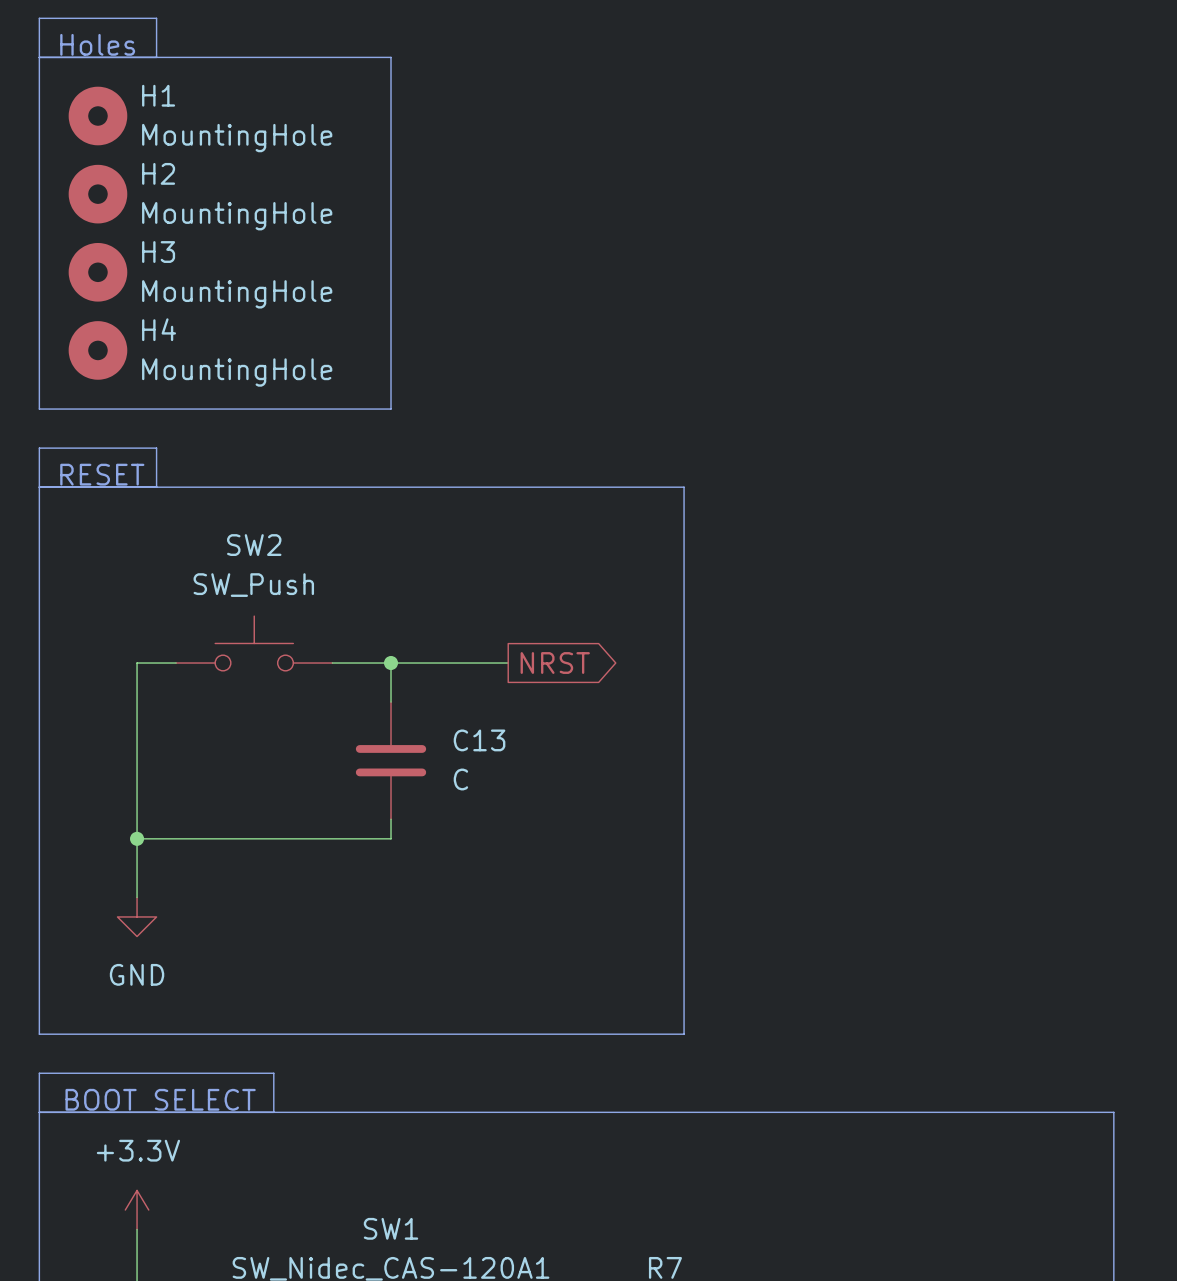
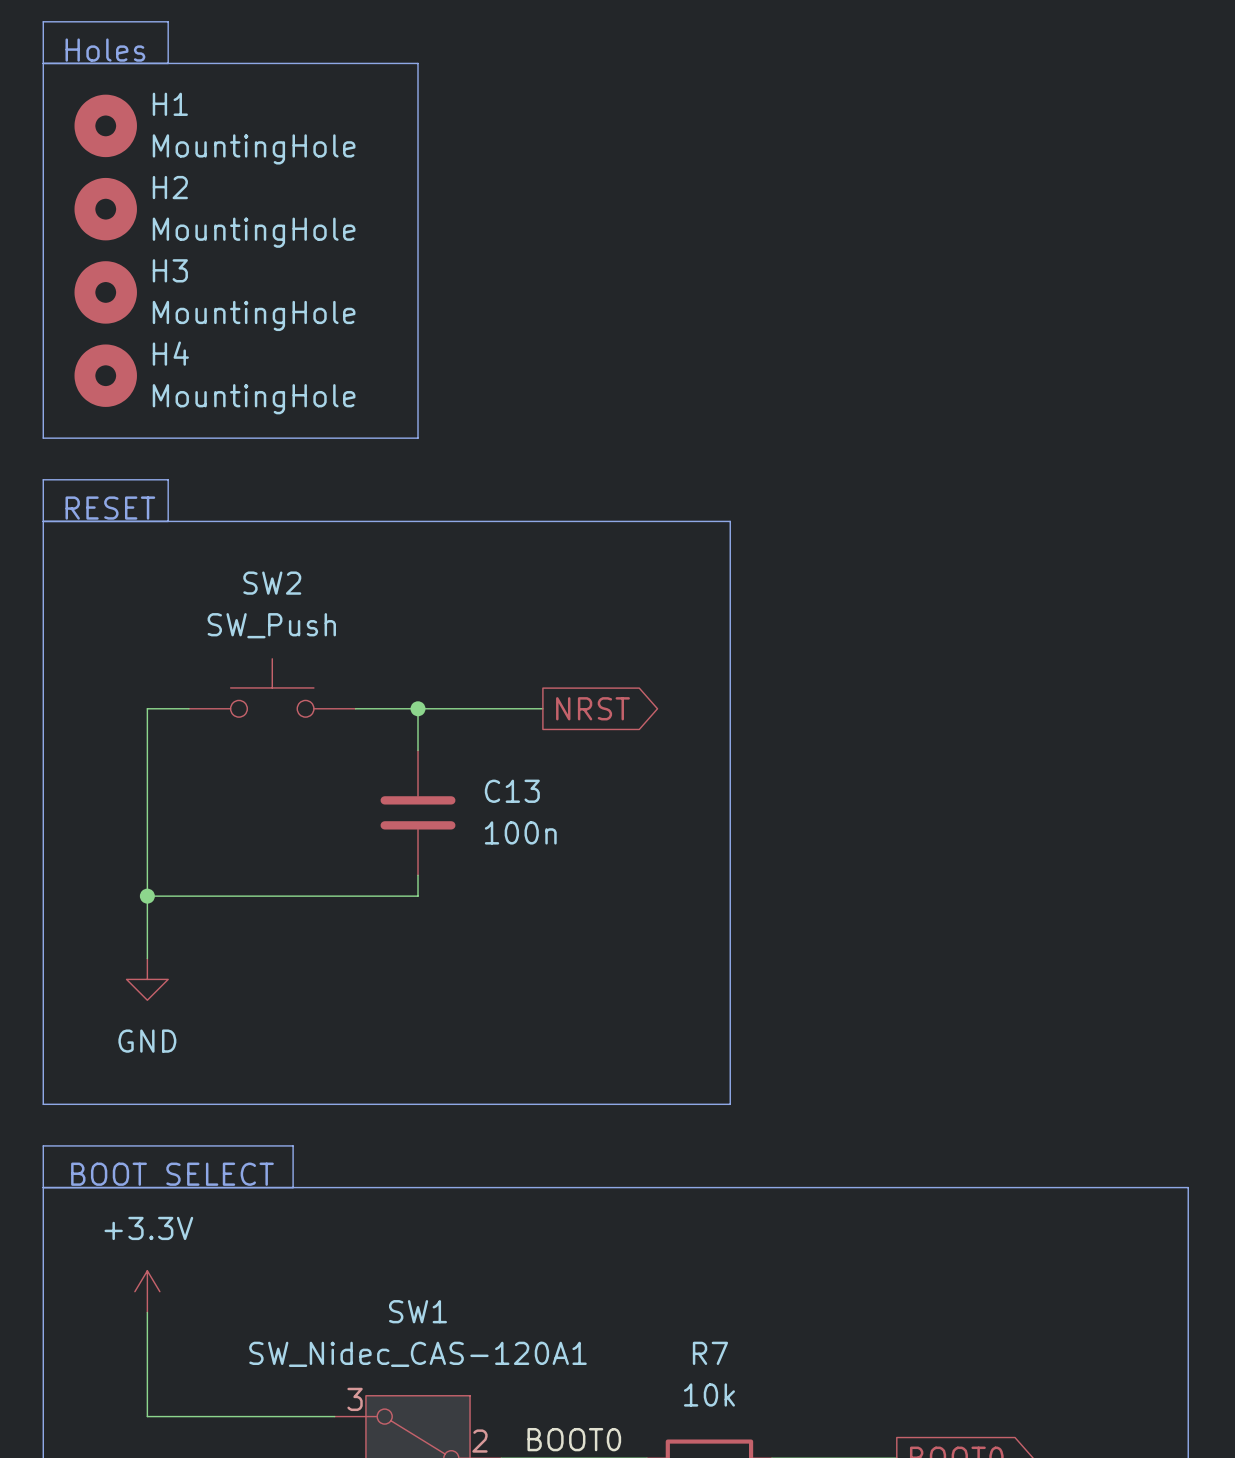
C13 value: C (460, 779) -> 100n (520, 832)

